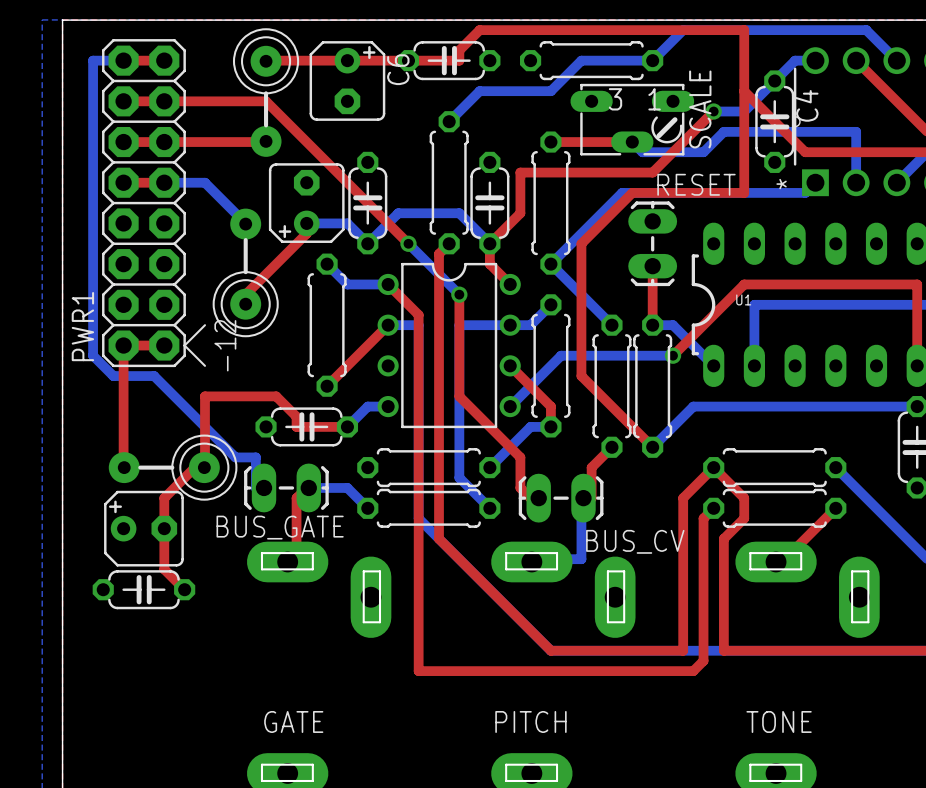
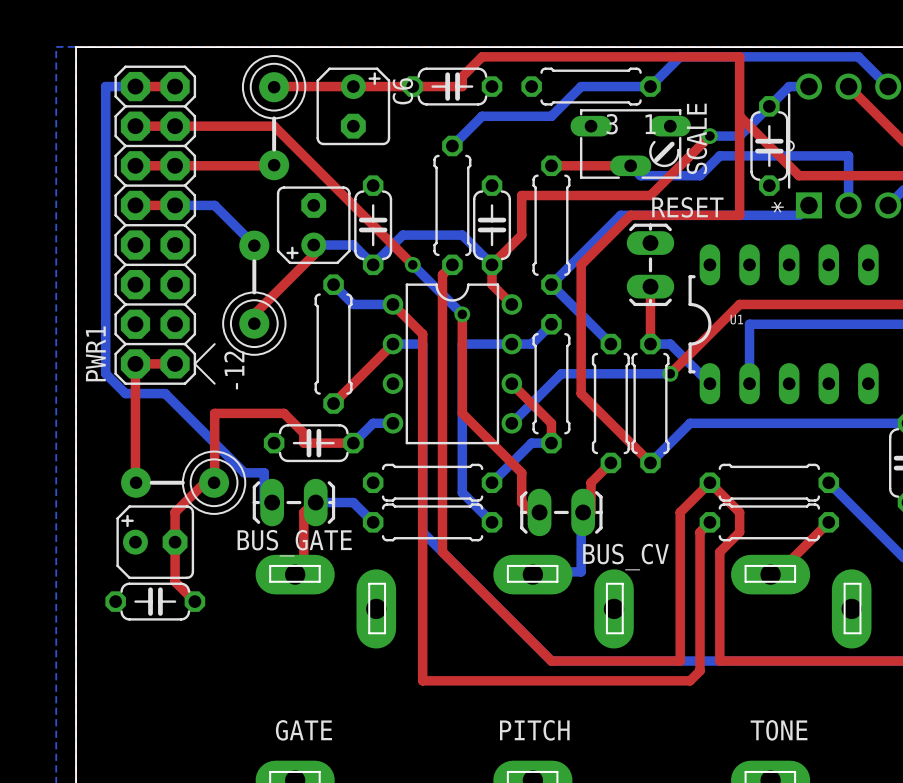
C4 name: C4 (806, 105) -> none

